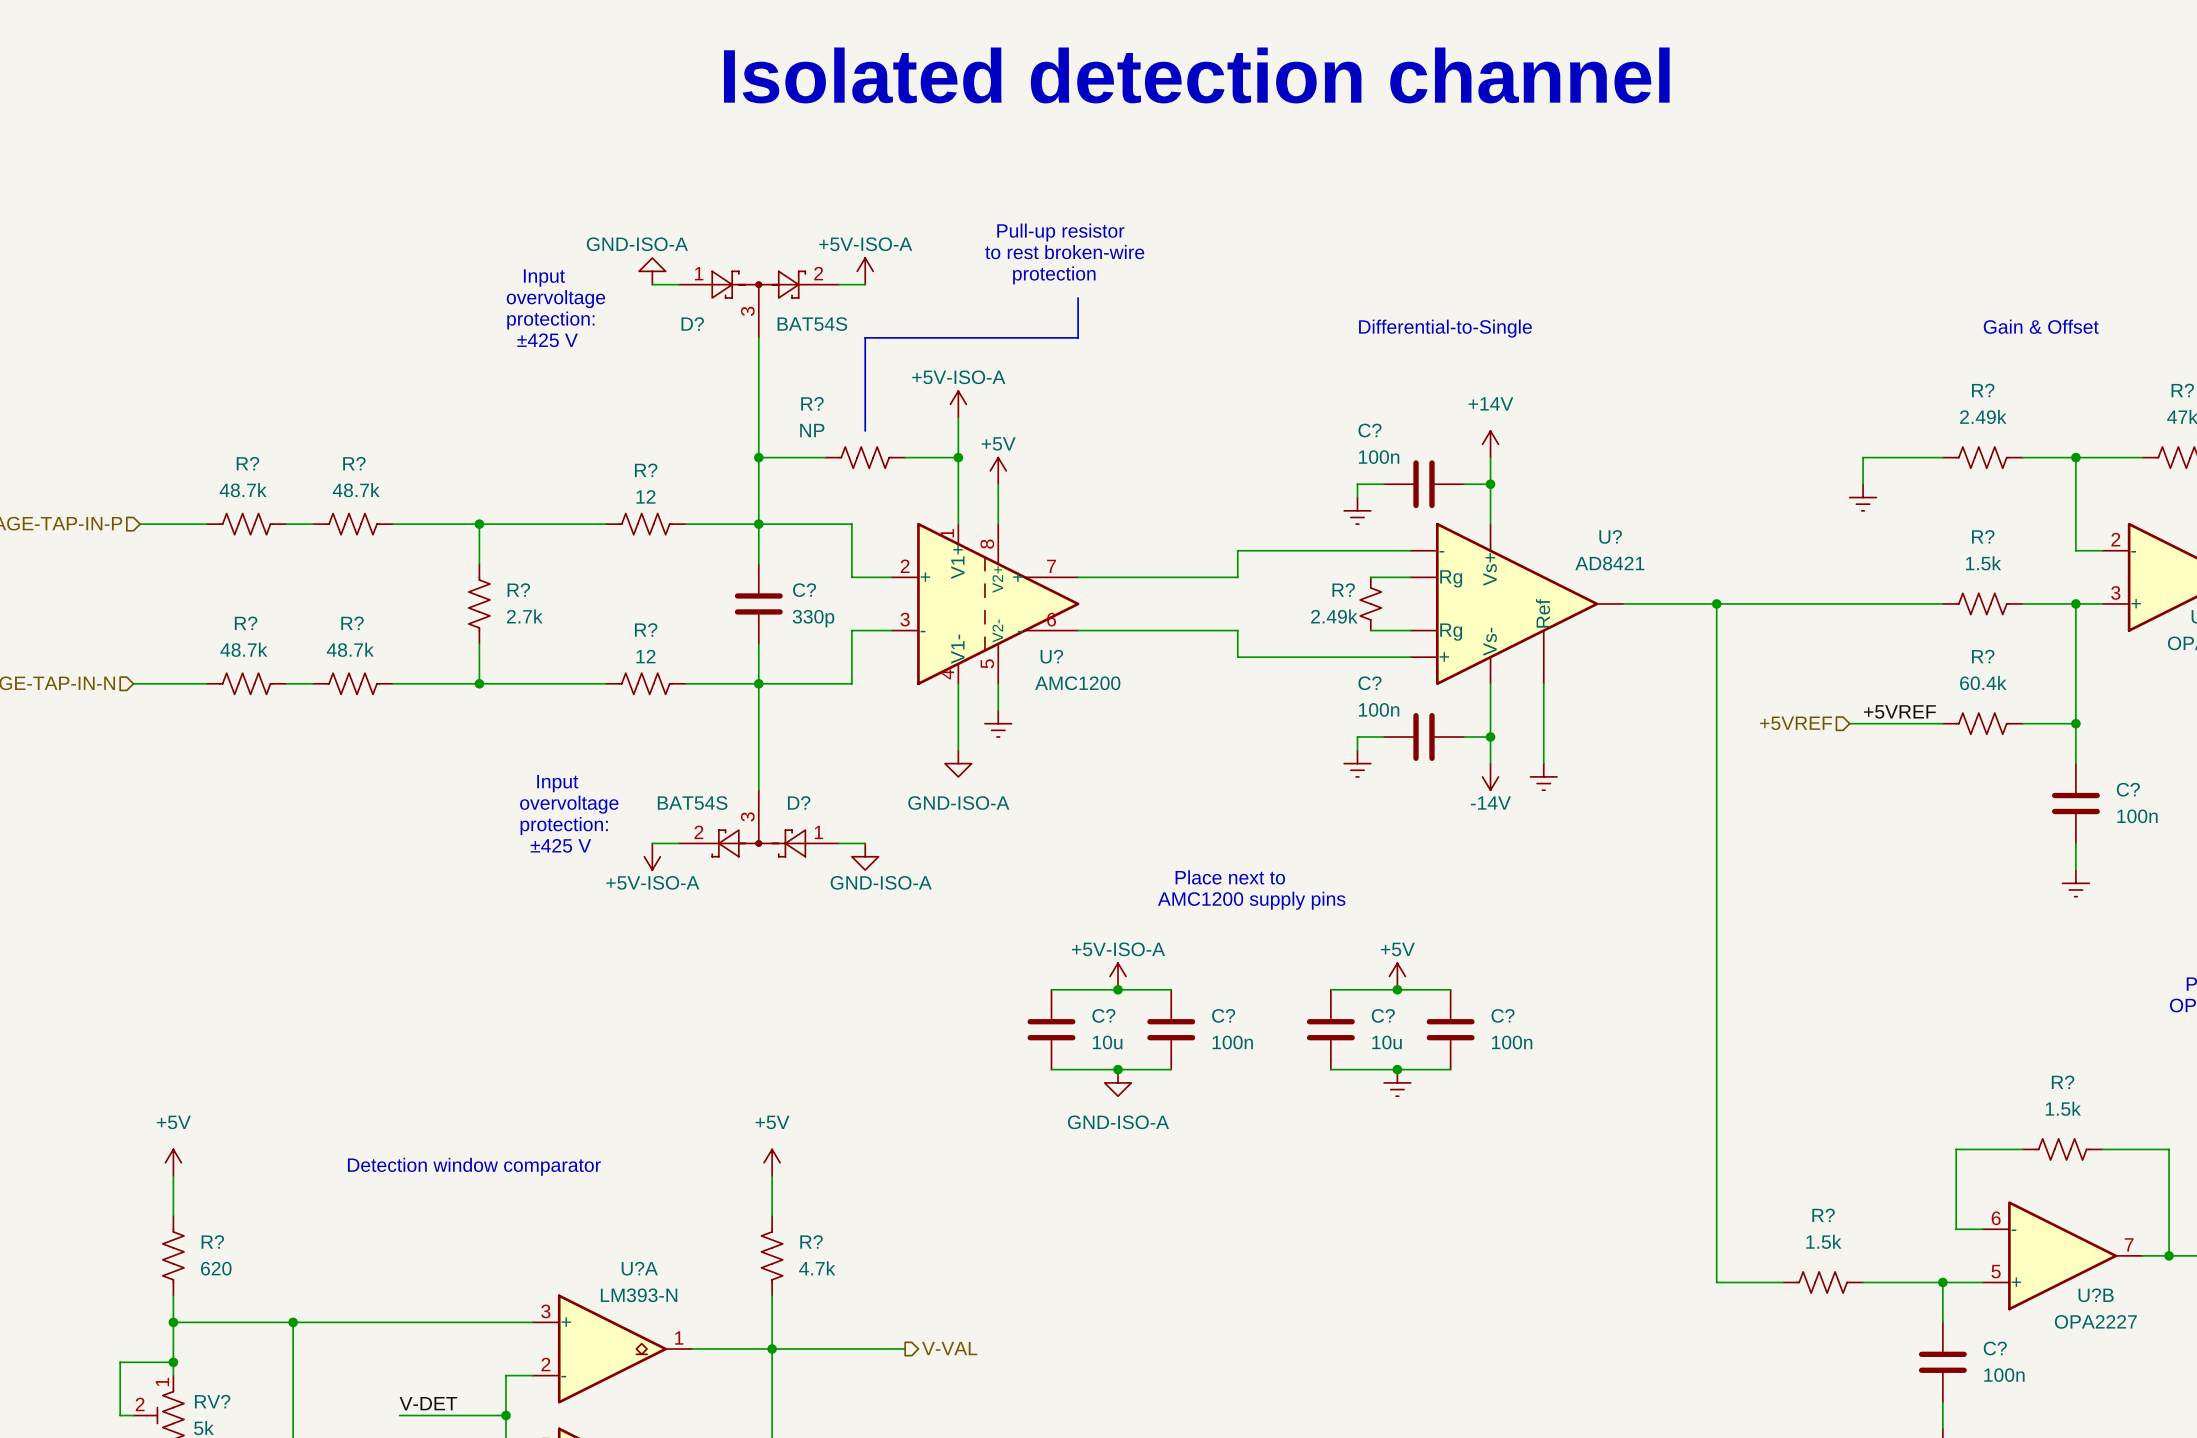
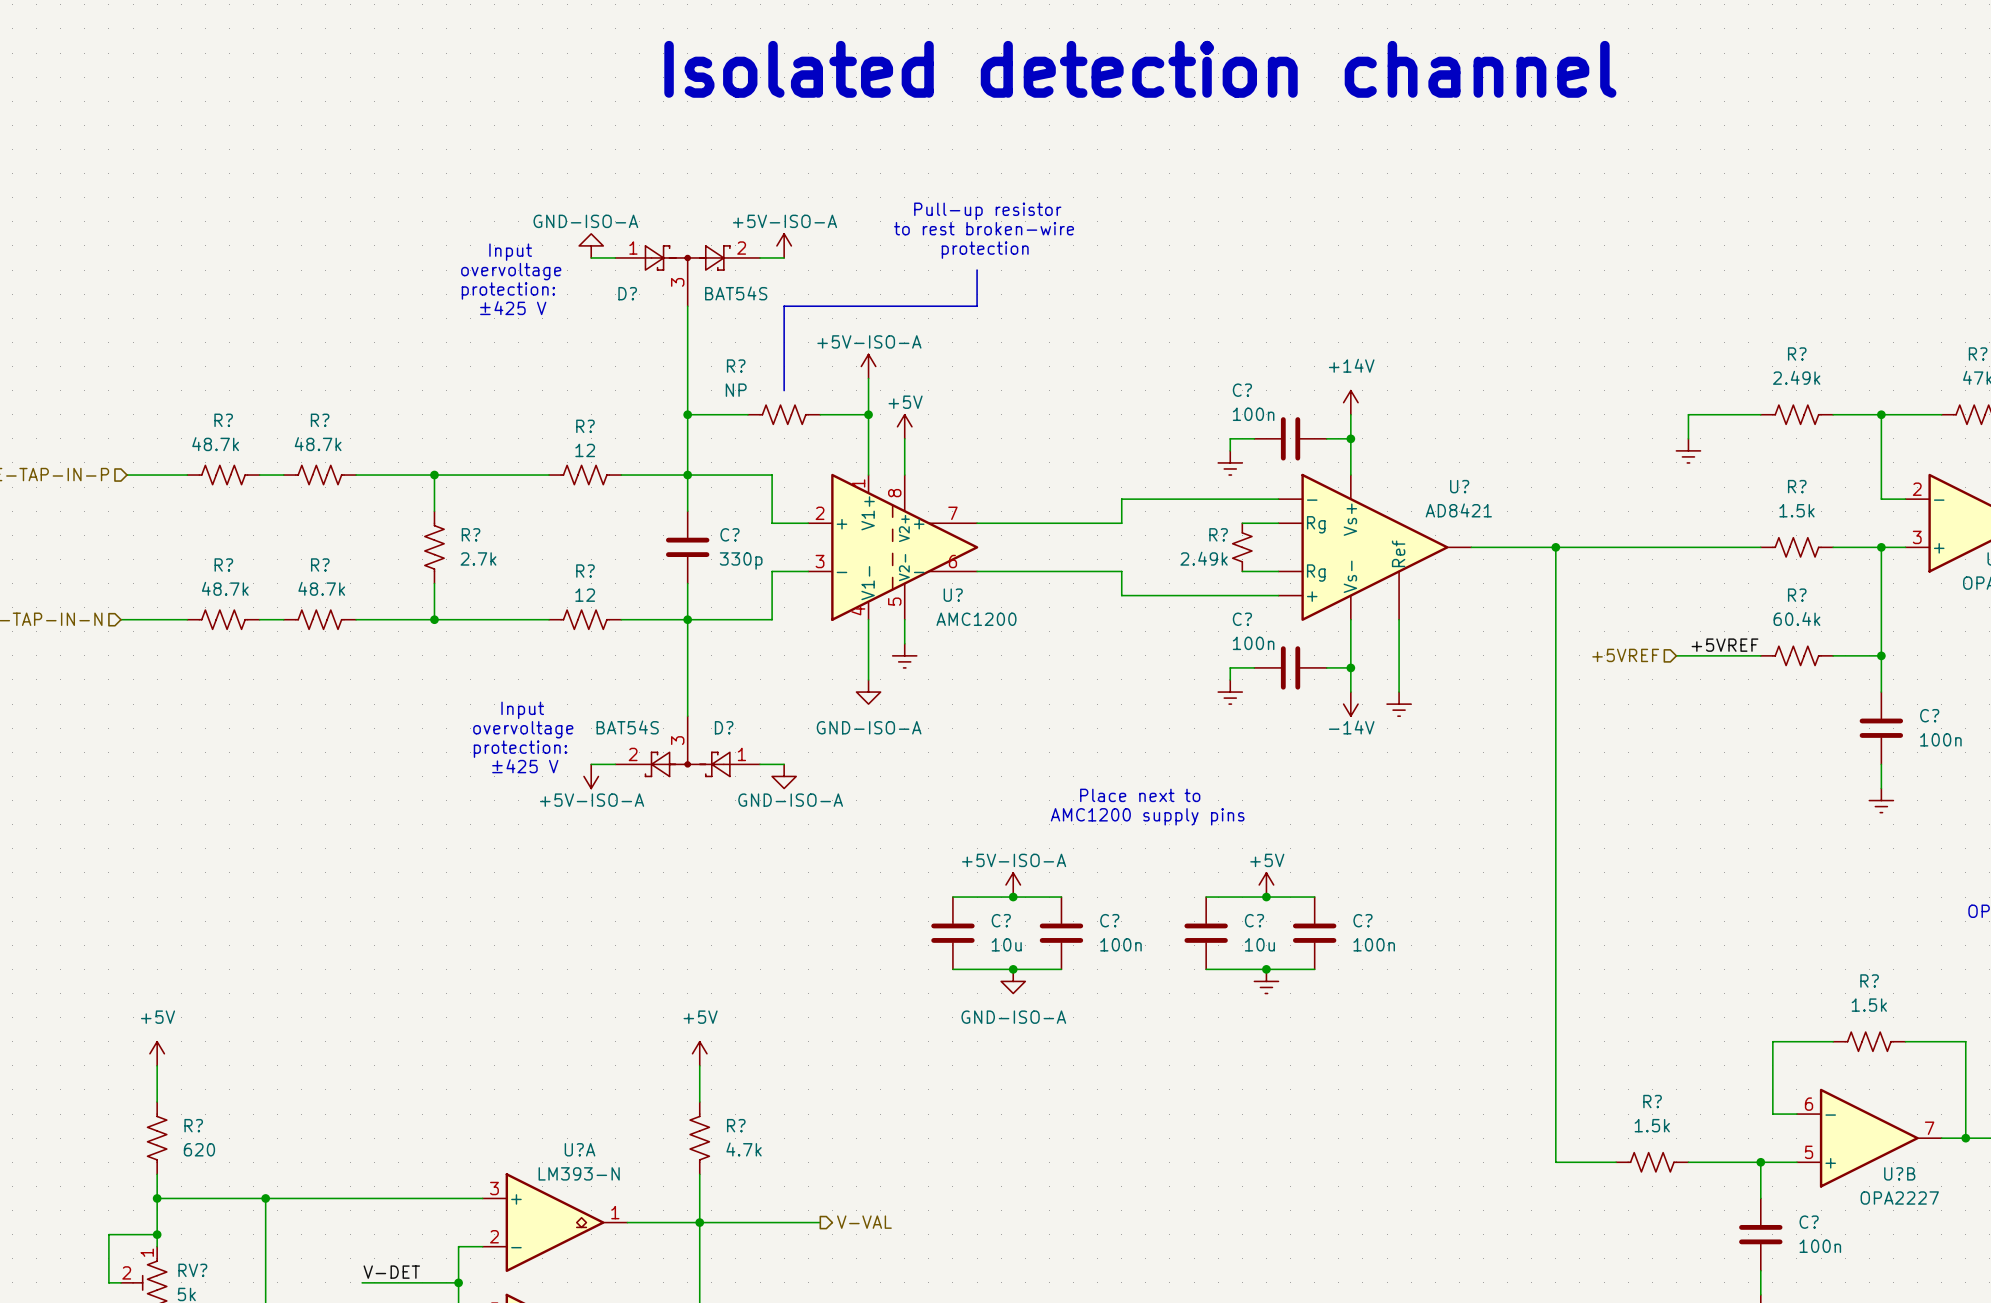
text: Gain & Offset (2041, 326) -> none
text: Differential-to-Single (1445, 328) -> none
text: Detection window comparator (474, 1166) -> none

